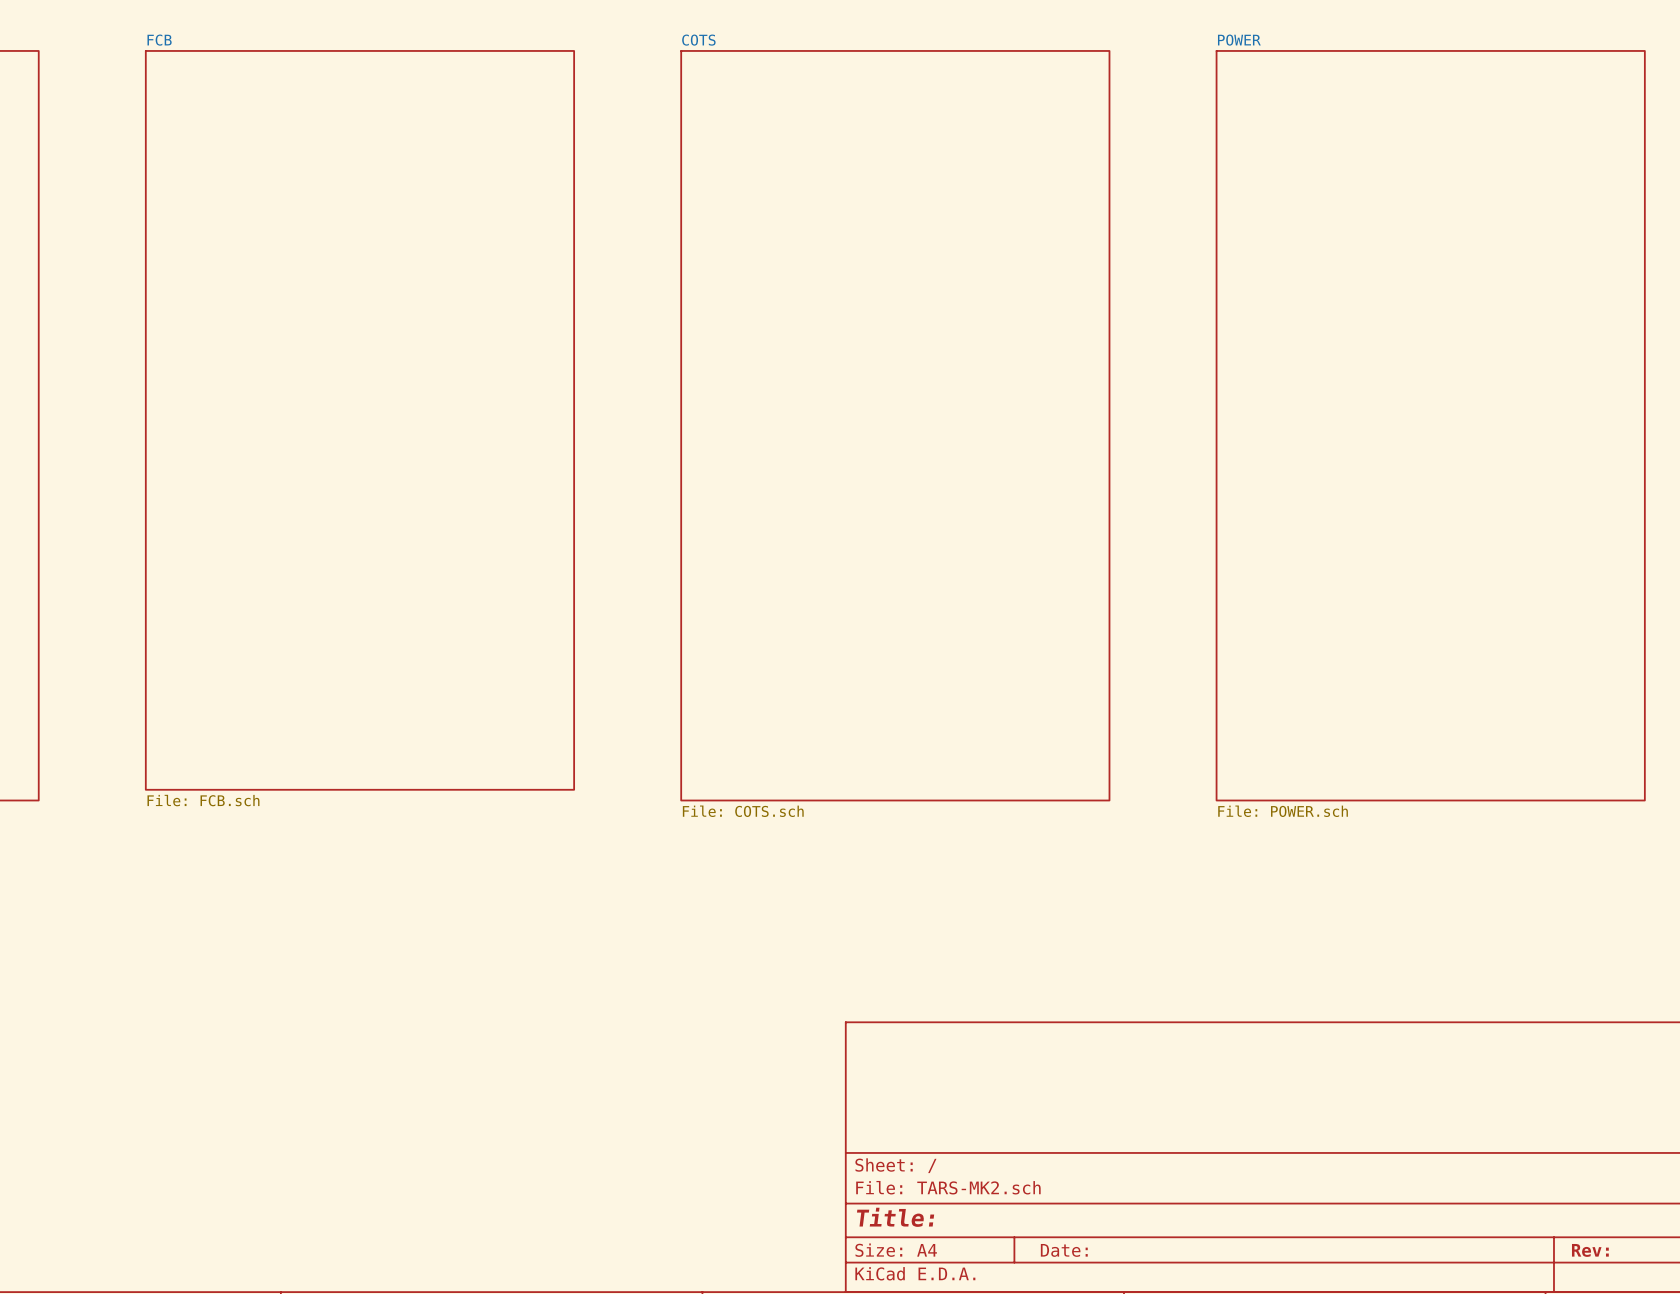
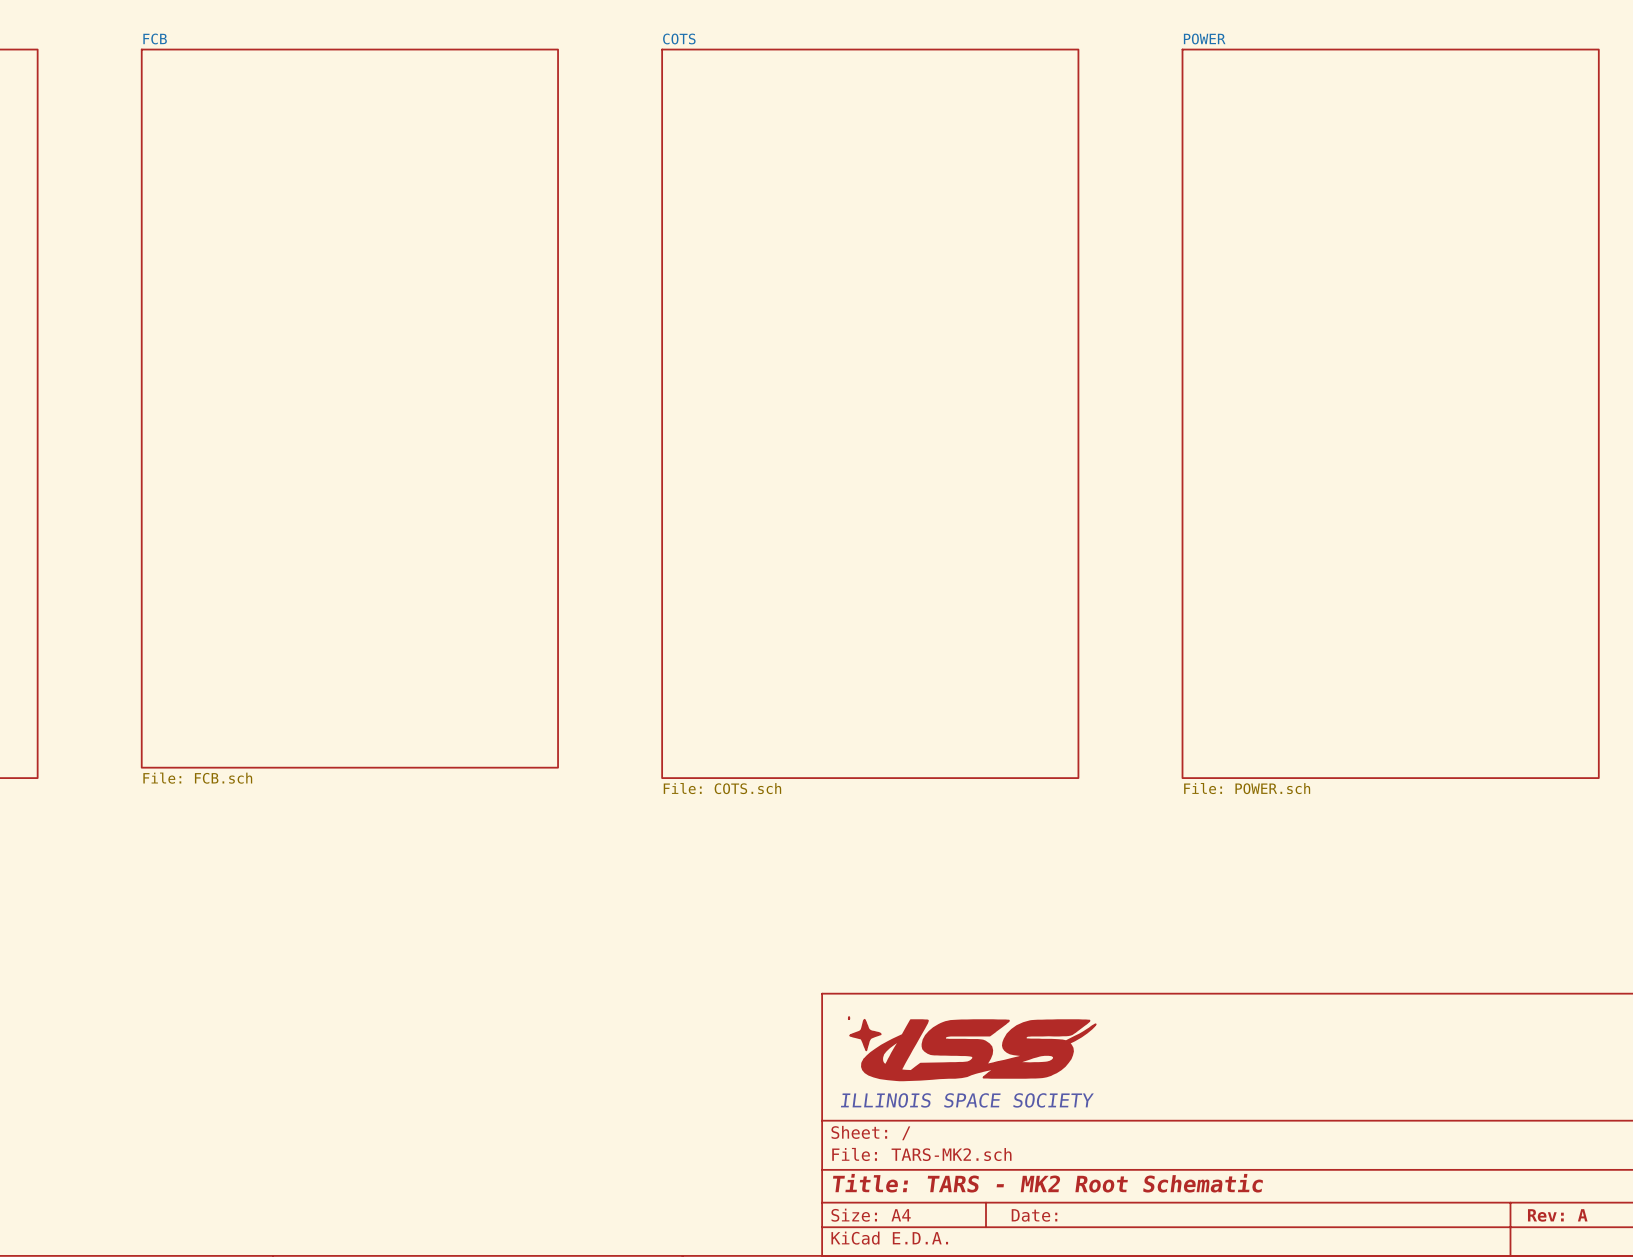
power symbol: none -> (972, 1048)
text: none -> ILLINOIS SPACE SOCIETY (967, 1100)
title block: Title: (895, 1217) -> Title: TARS - MK2 Root Schematic (1047, 1183)
title block: Rev: (1590, 1250) -> Rev: A (1557, 1215)

